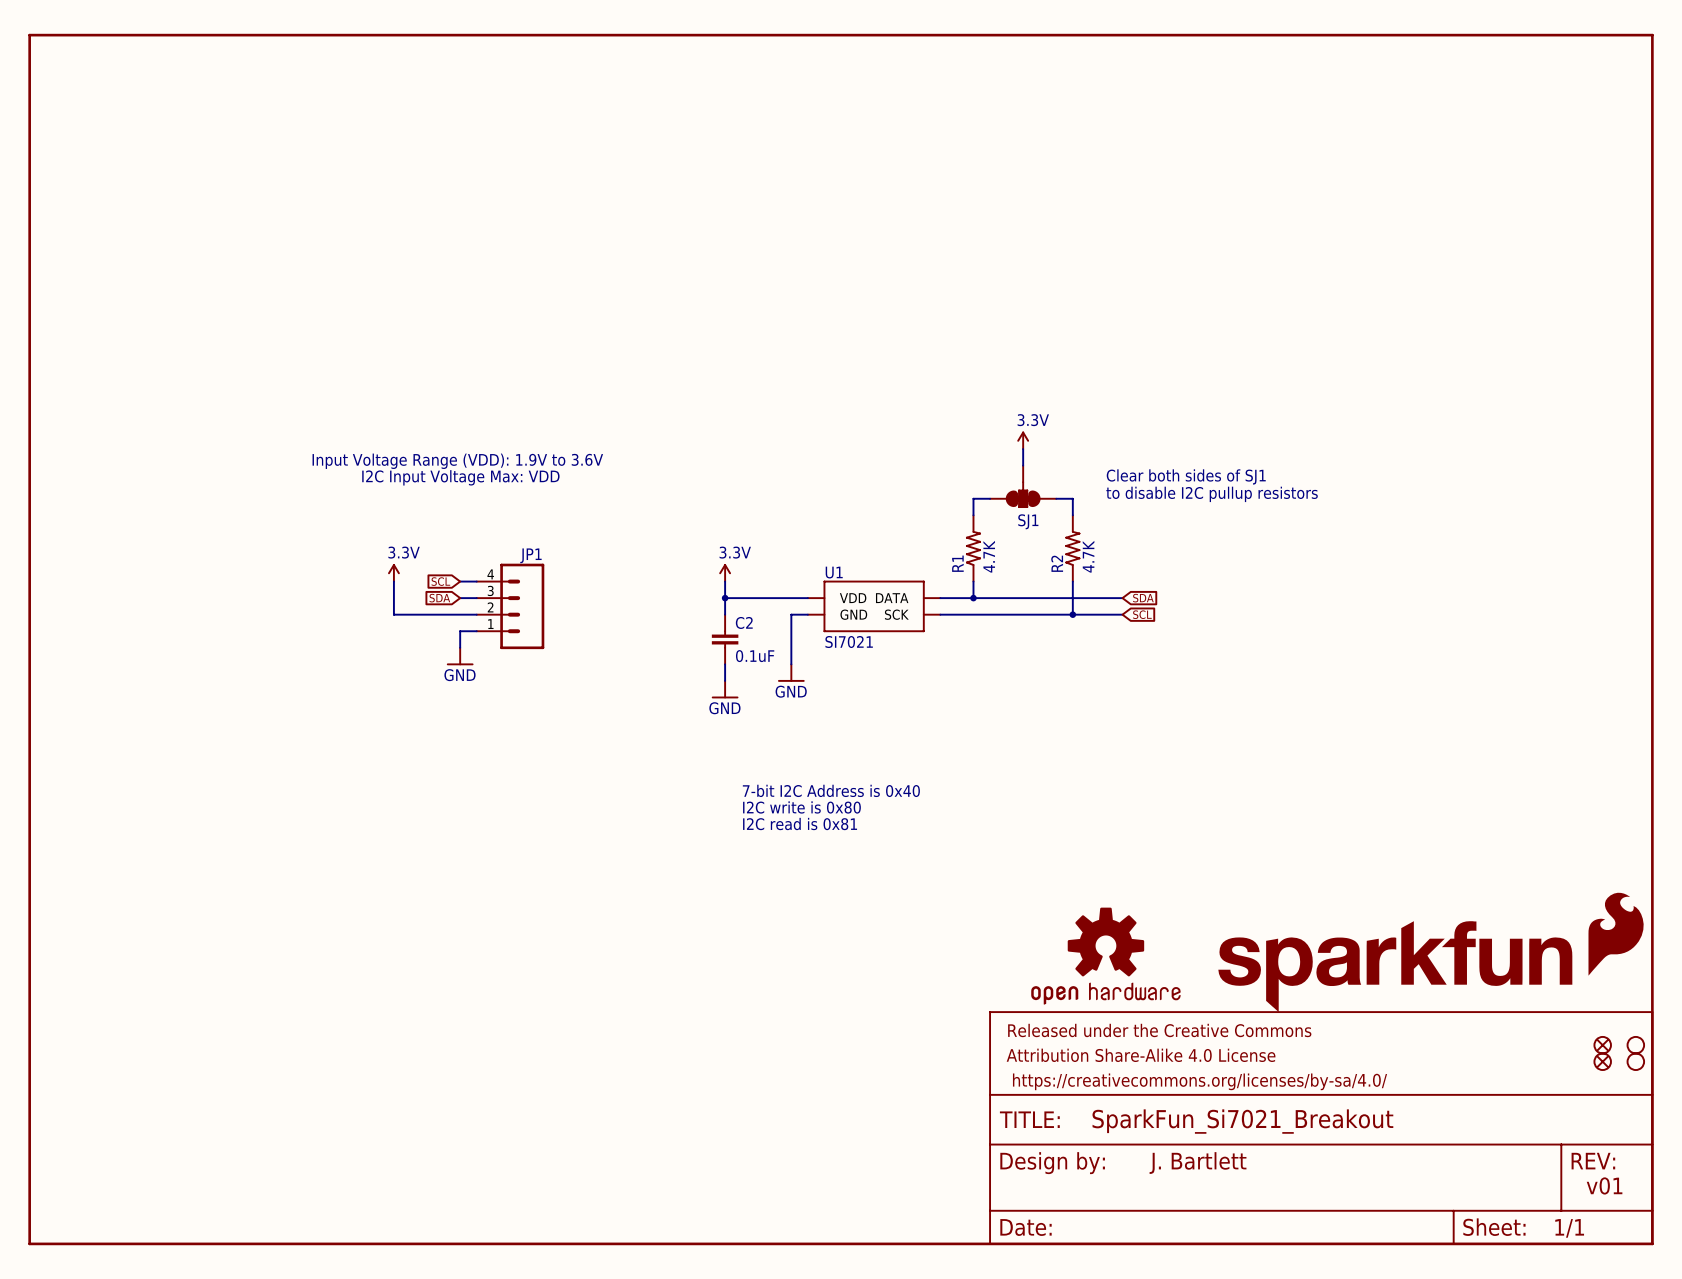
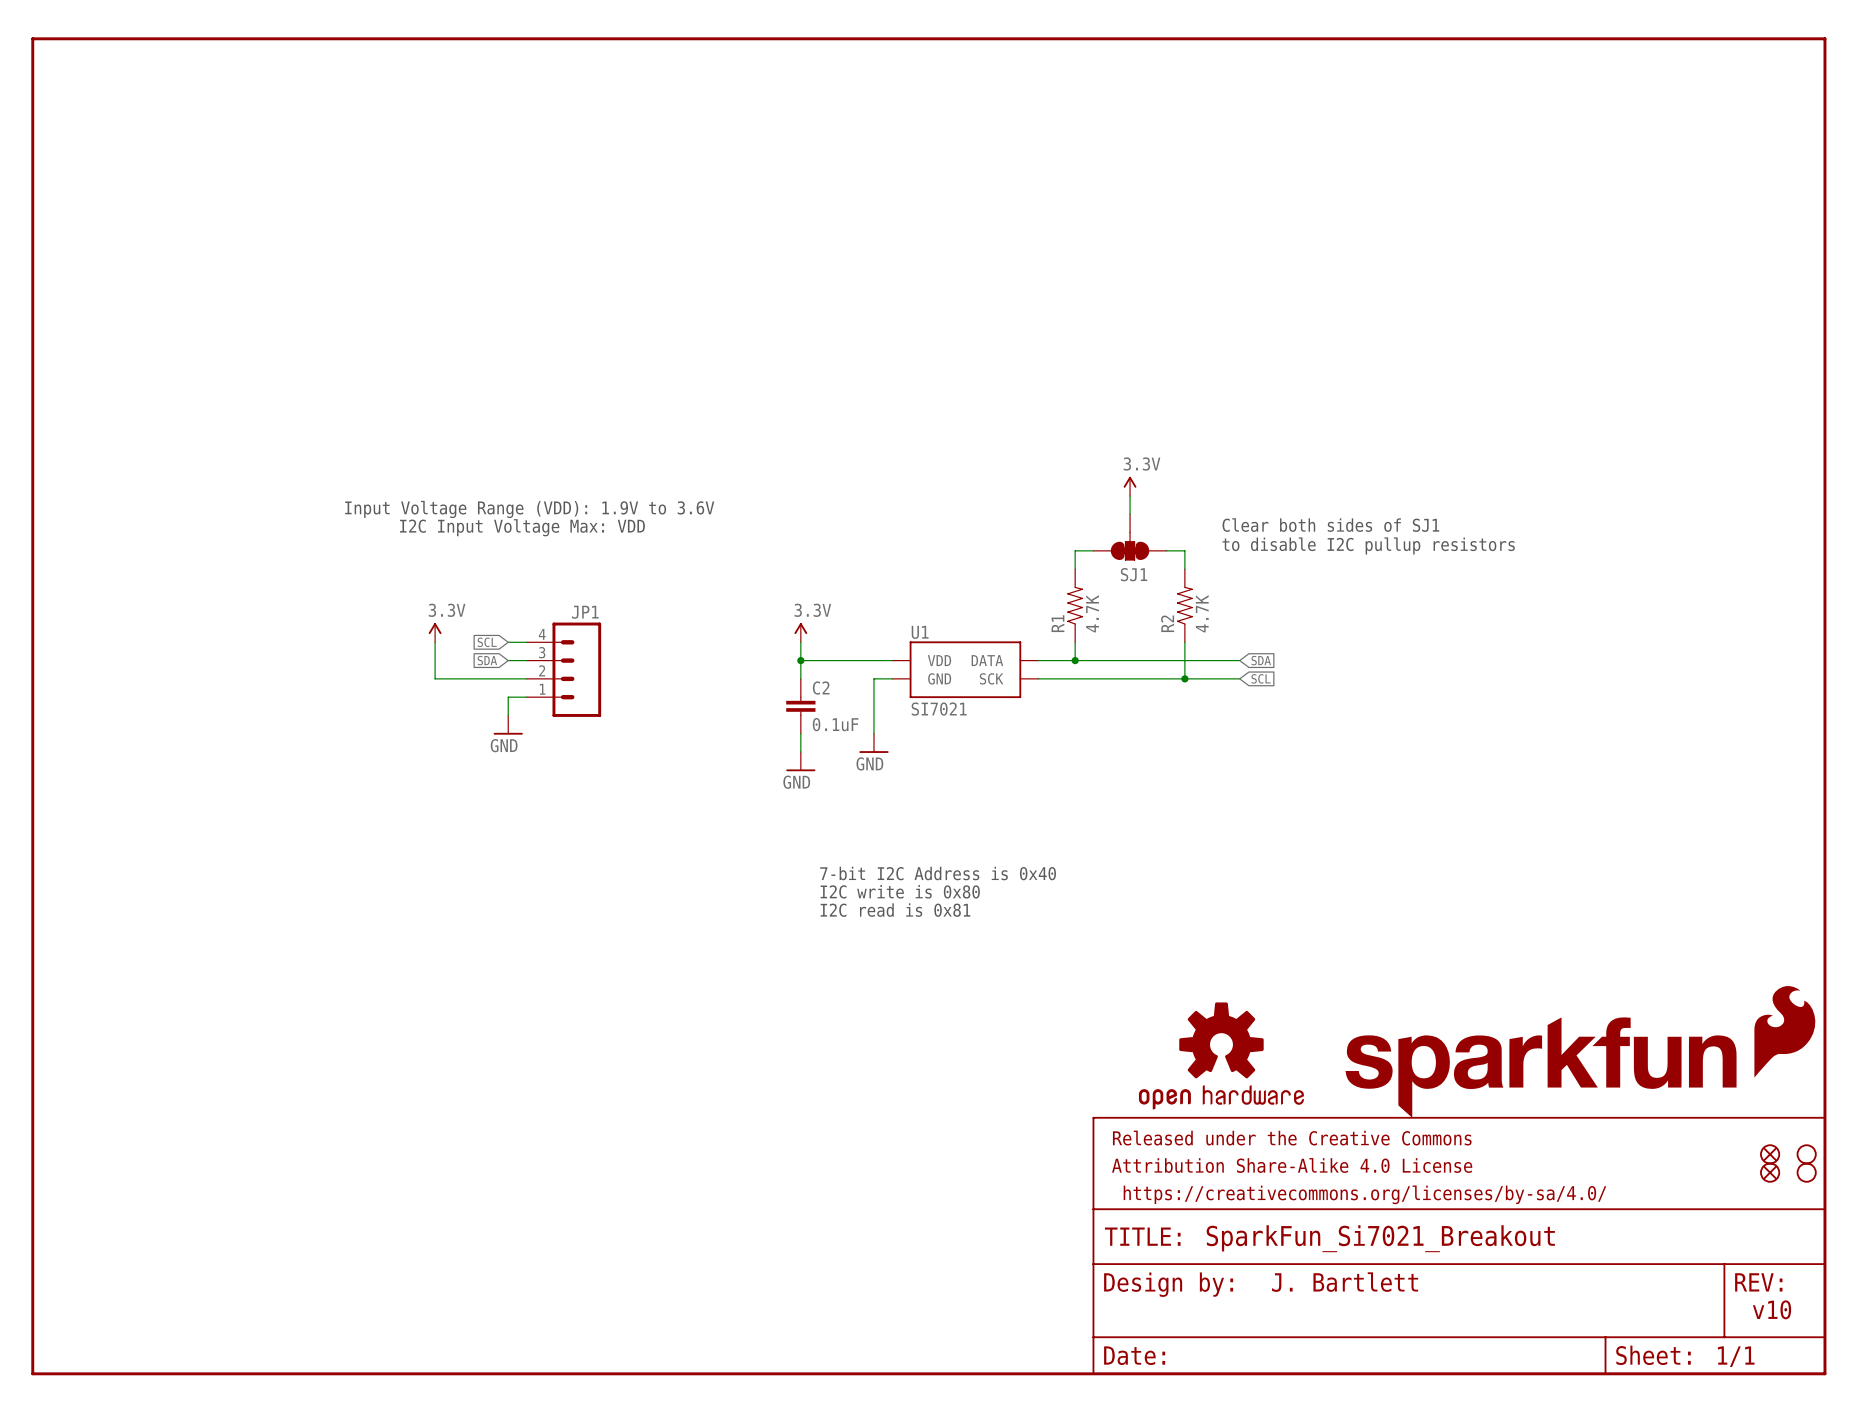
text: v01 (1604, 1185) -> v10 (1772, 1309)

